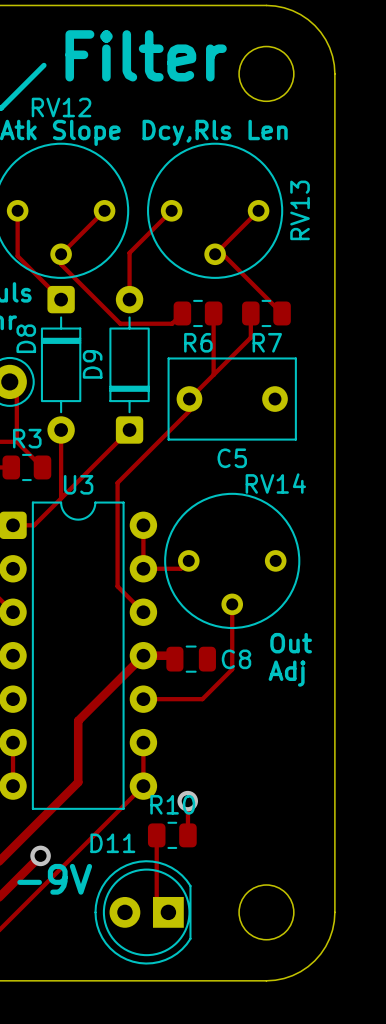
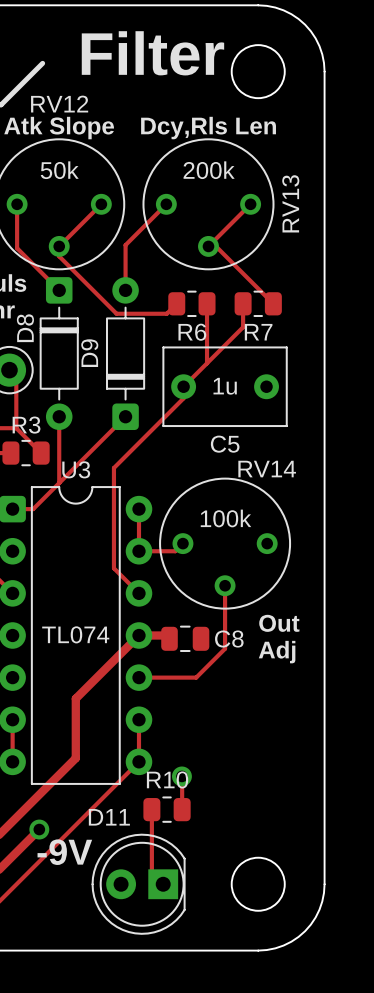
text: none -> 50k (59, 170)
text: none -> 200k (209, 170)
C5 value: none -> 1u (225, 386)
text: none -> 100k (226, 518)
U3 value: none -> TL074 (75, 634)

